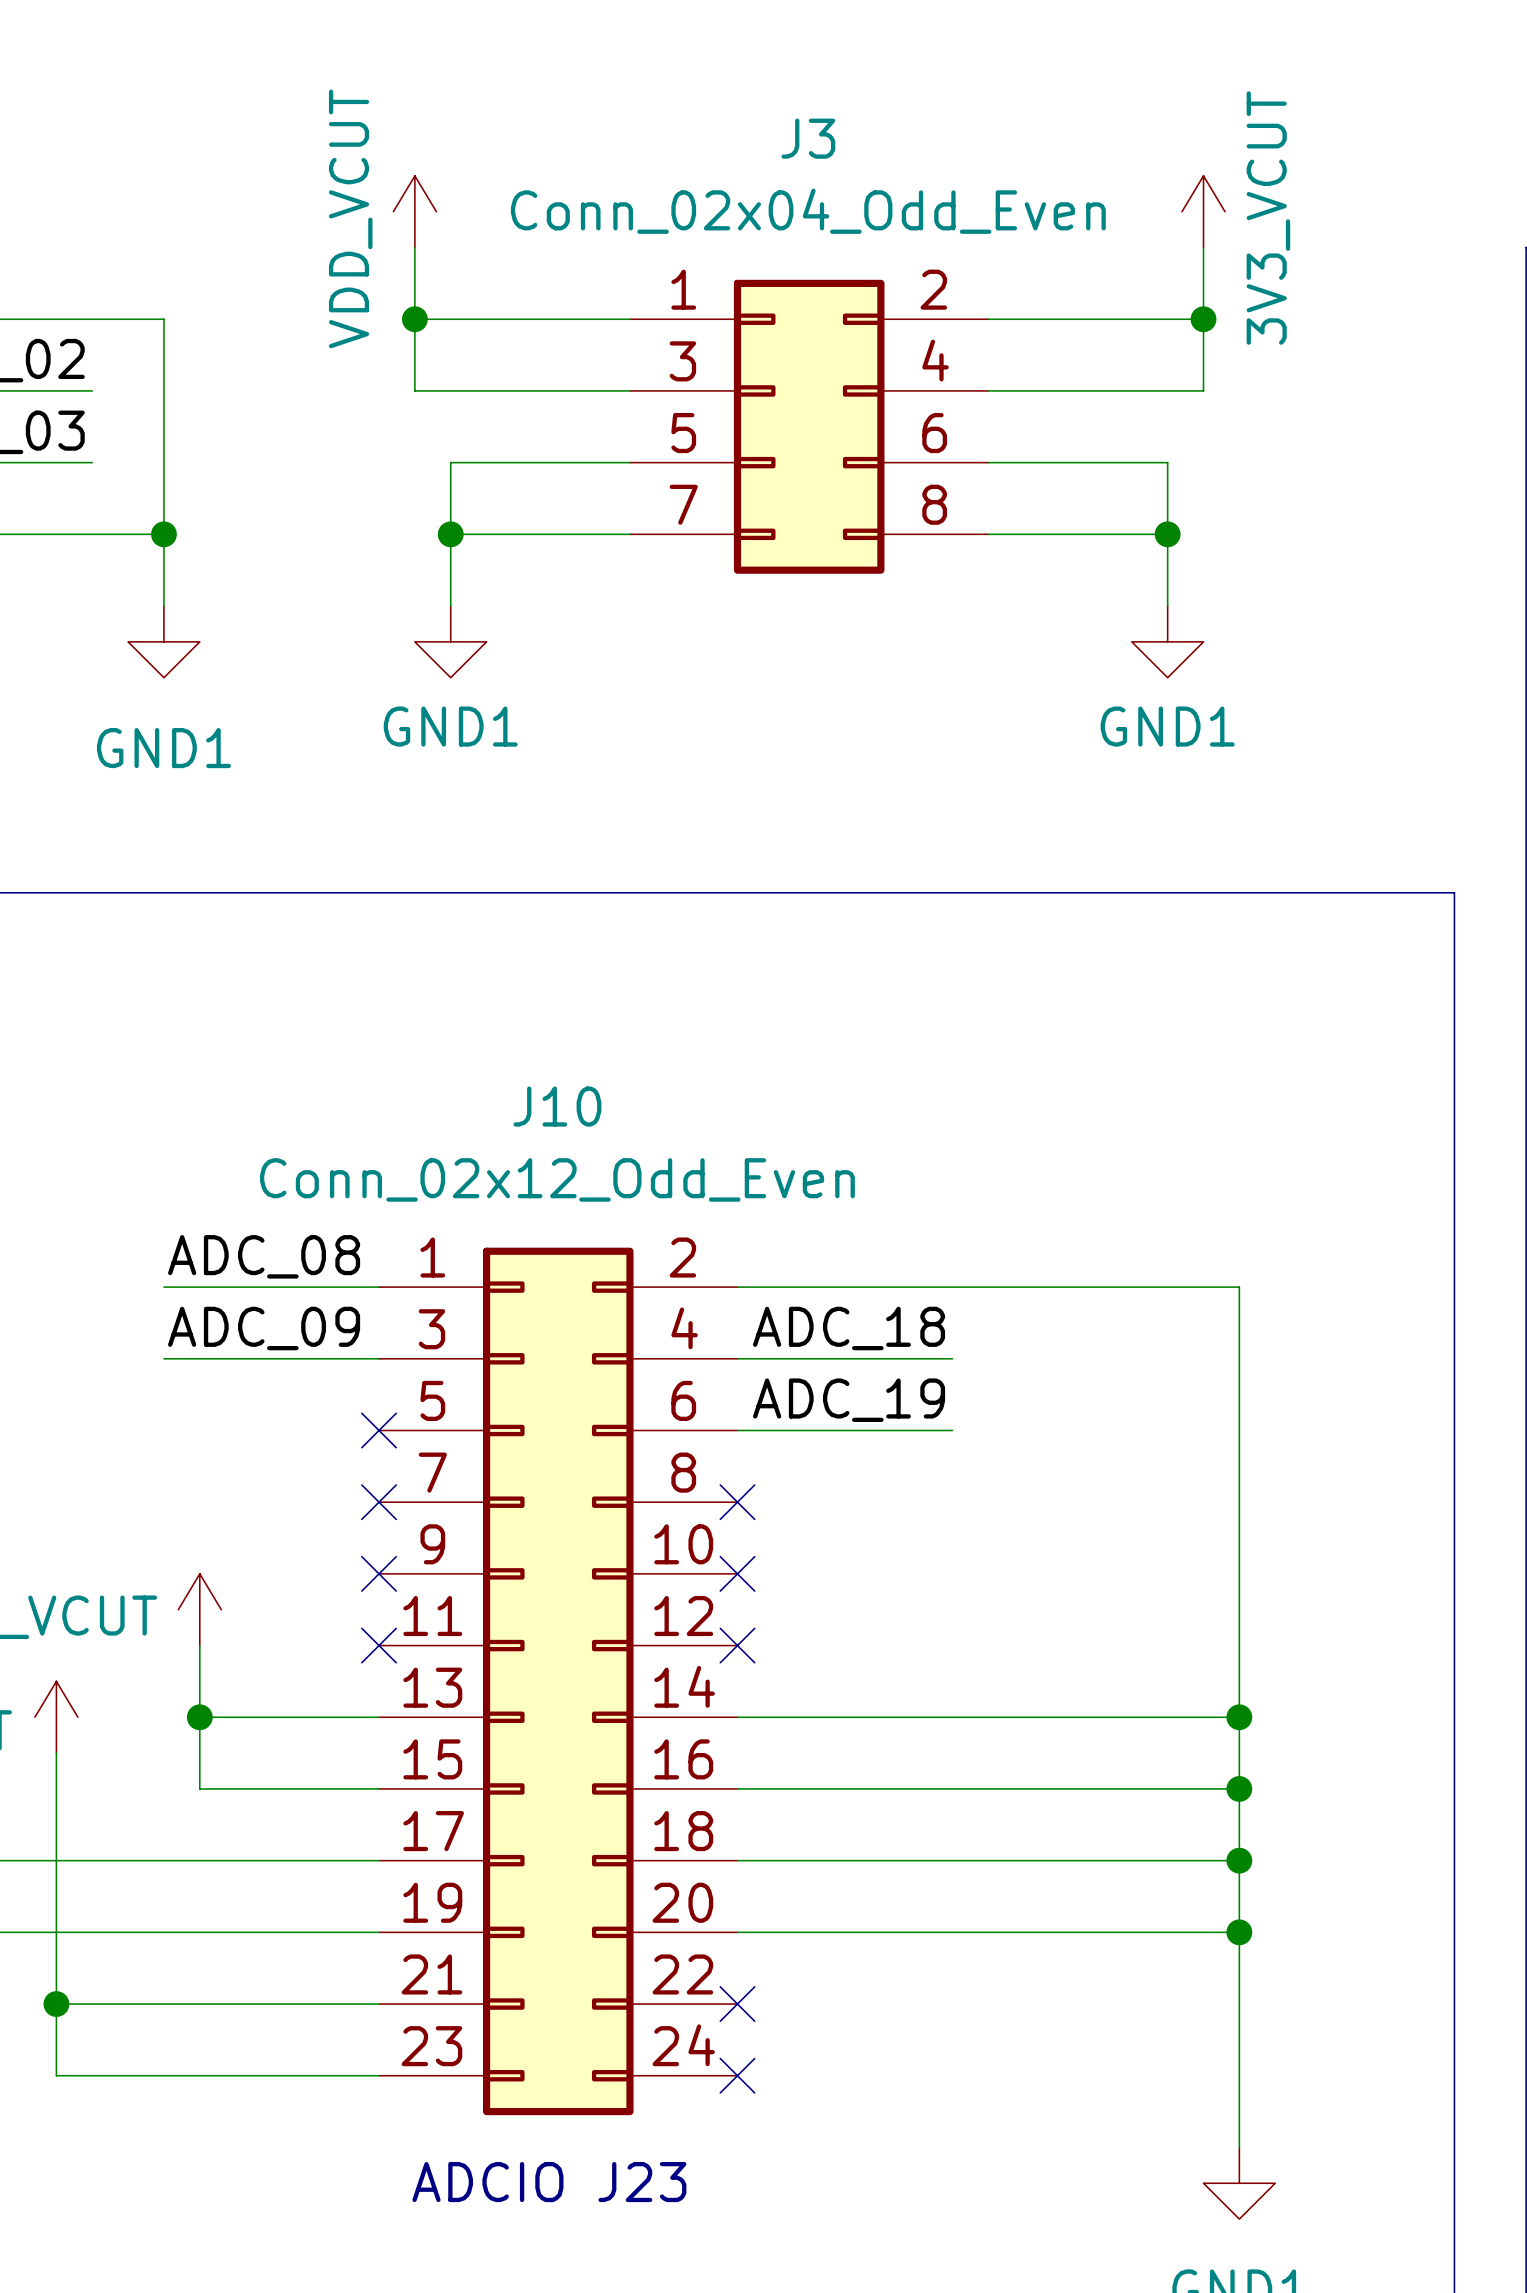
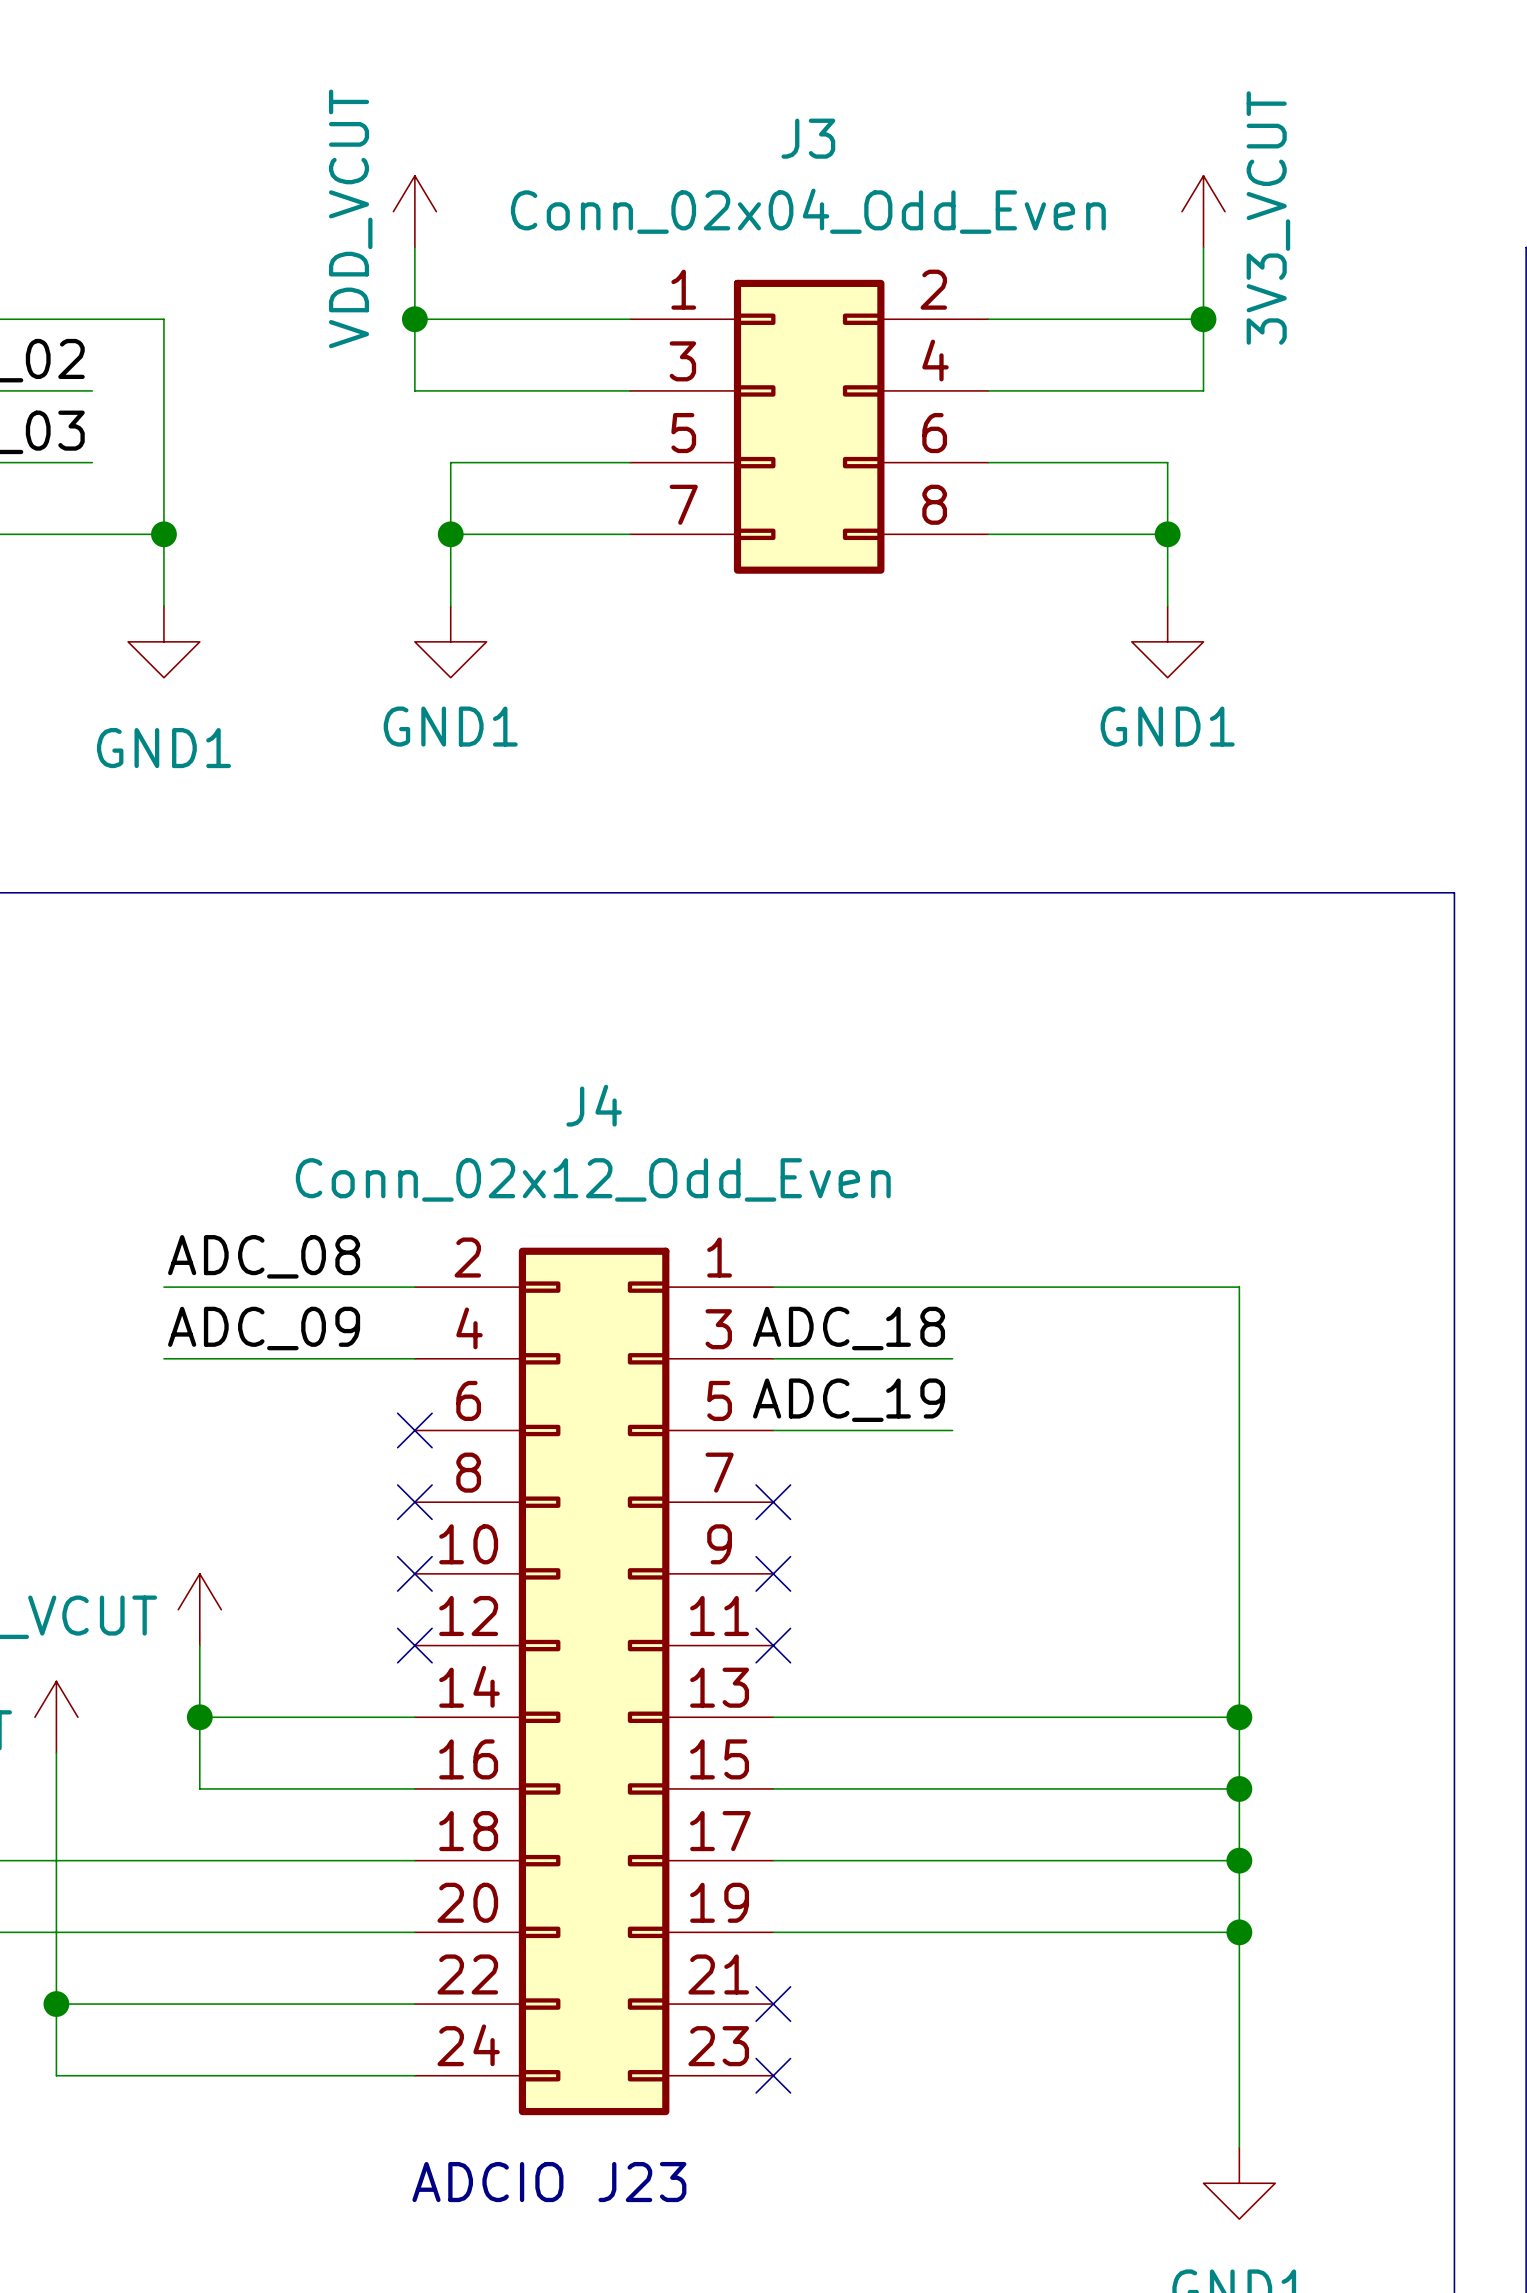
no-connect mark position: (379, 1430) -> (414, 1430)
no-connect mark position: (379, 1502) -> (414, 1502)
no-connect mark position: (737, 1502) -> (773, 1502)
no-connect mark position: (379, 1573) -> (414, 1573)
no-connect mark position: (737, 1573) -> (773, 1573)
no-connect mark position: (379, 1645) -> (414, 1645)
no-connect mark position: (737, 1645) -> (773, 1645)
J10: Conn_02x12_Odd_Even (558, 1681) -> none
J4: none -> Conn_02x12_Odd_Even (594, 1681)
no-connect mark position: (737, 2004) -> (773, 2004)
no-connect mark position: (737, 2075) -> (773, 2075)

